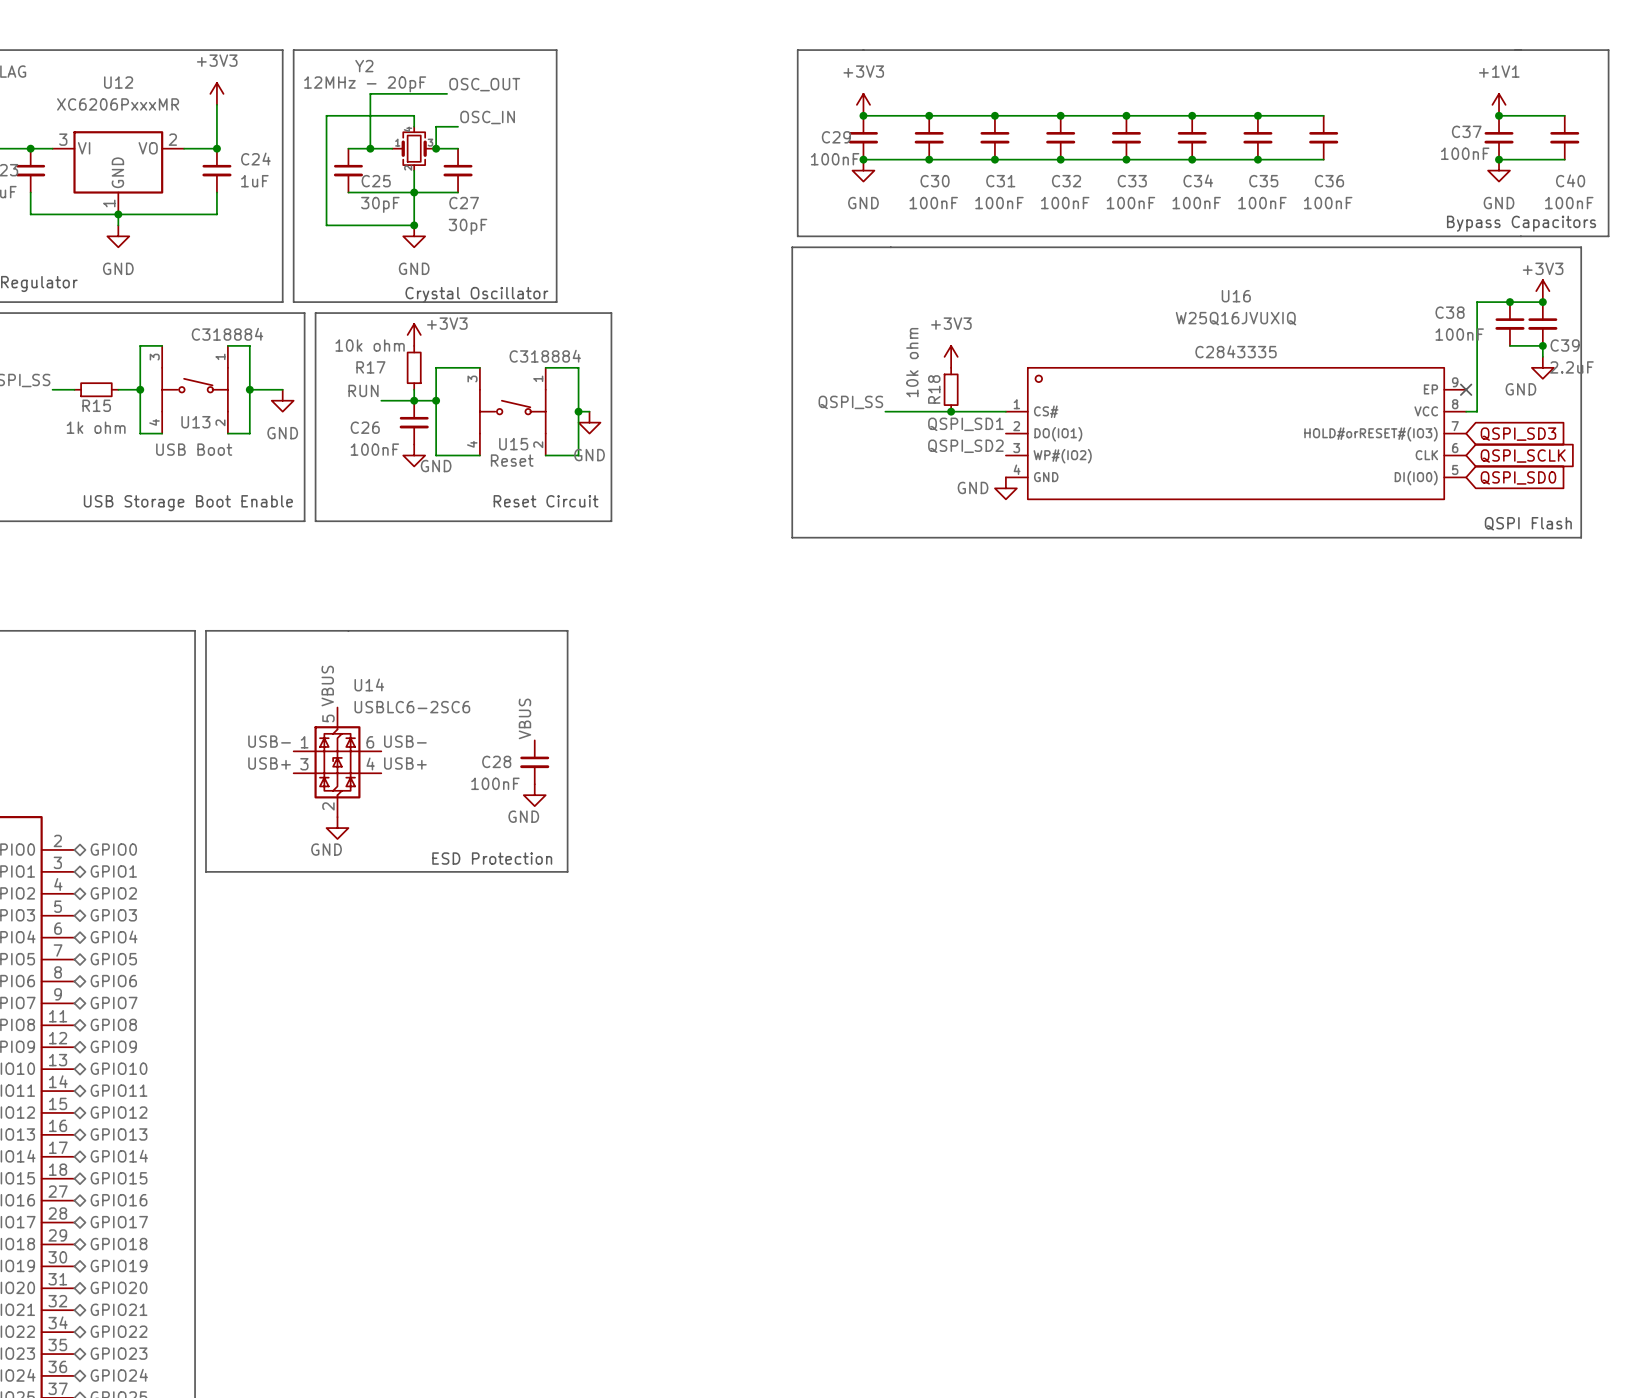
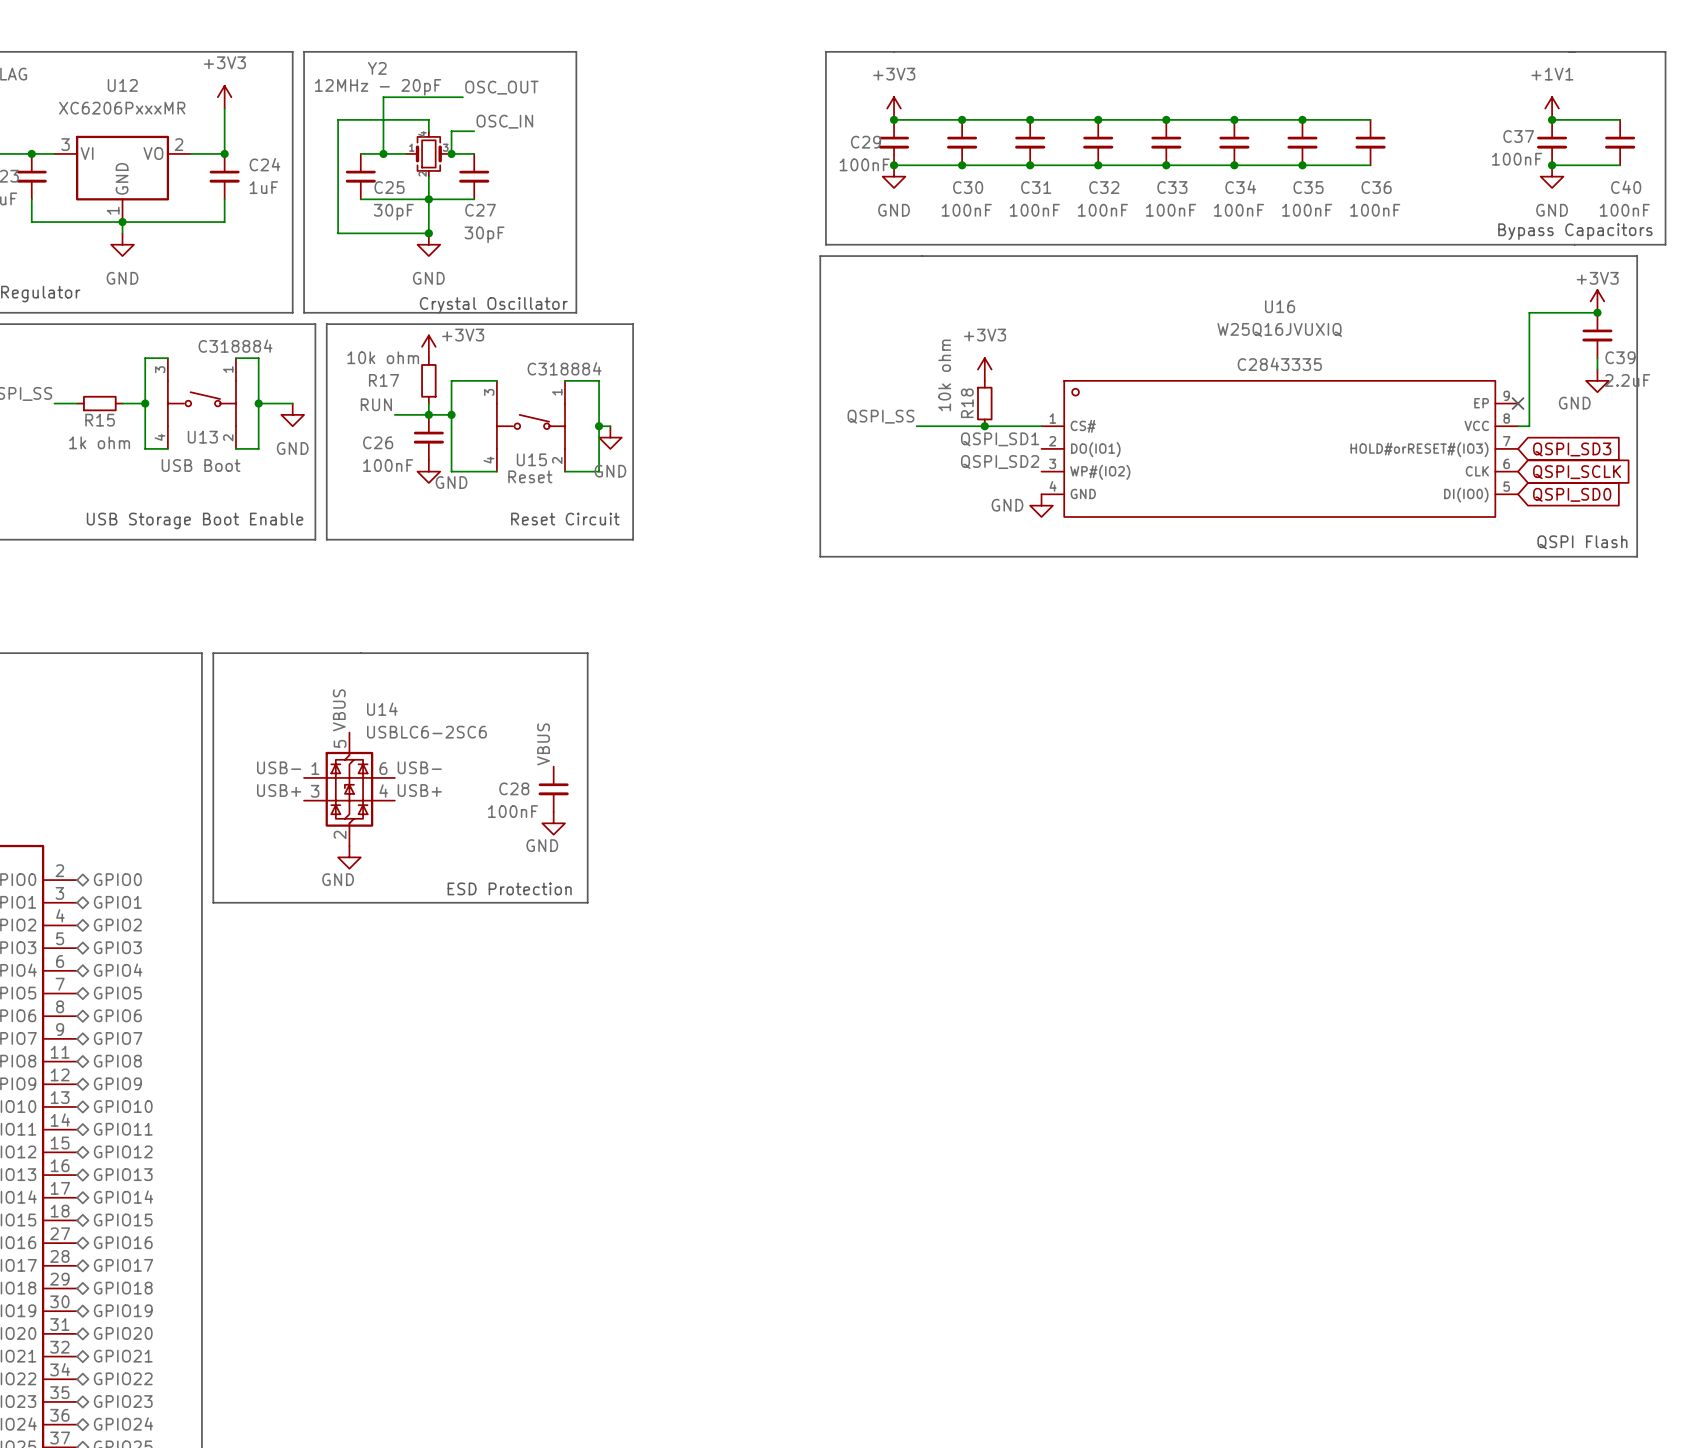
junction: (1509, 302) -> none
C38: 100nF (1509, 324) -> none
wire: (1509, 345) (1542, 345) -> none
junction: (1542, 345) -> none

